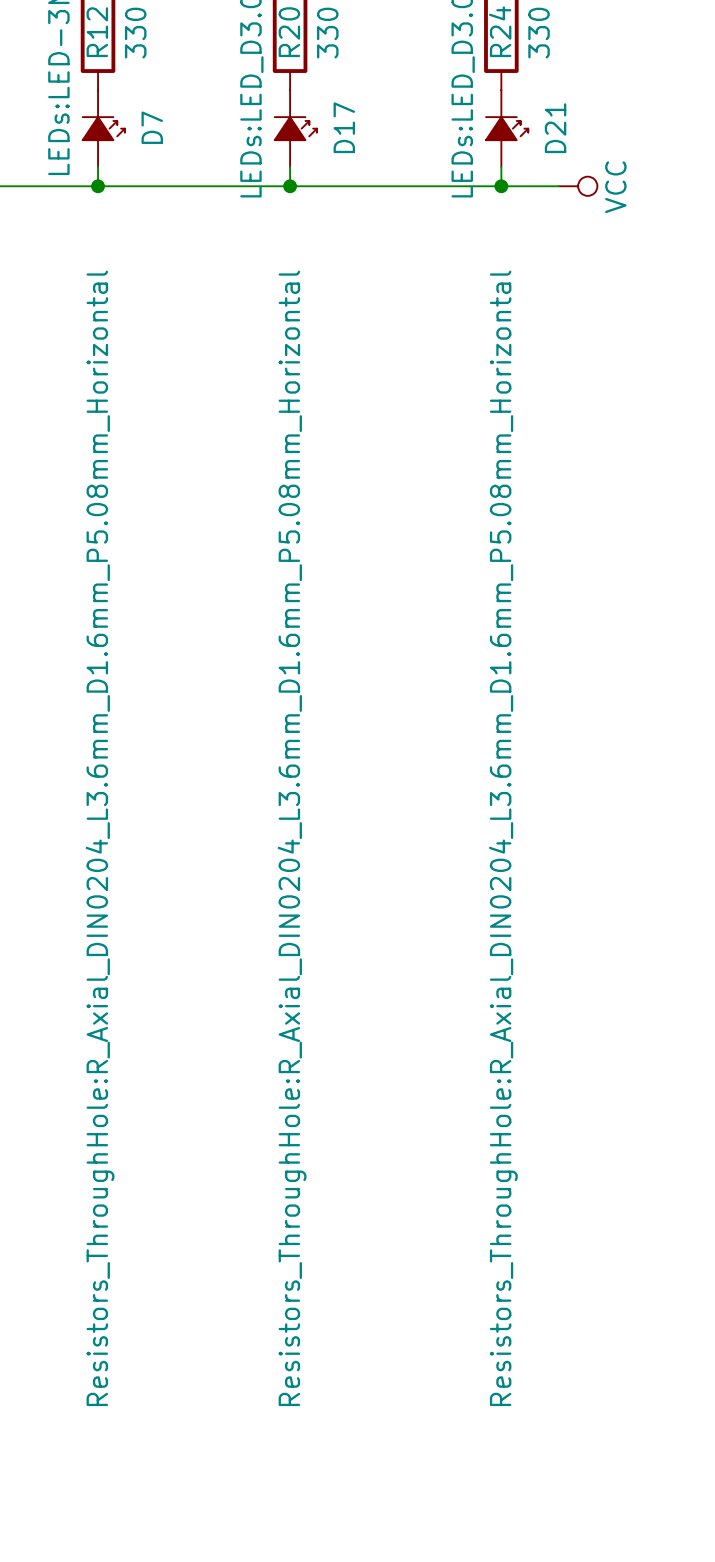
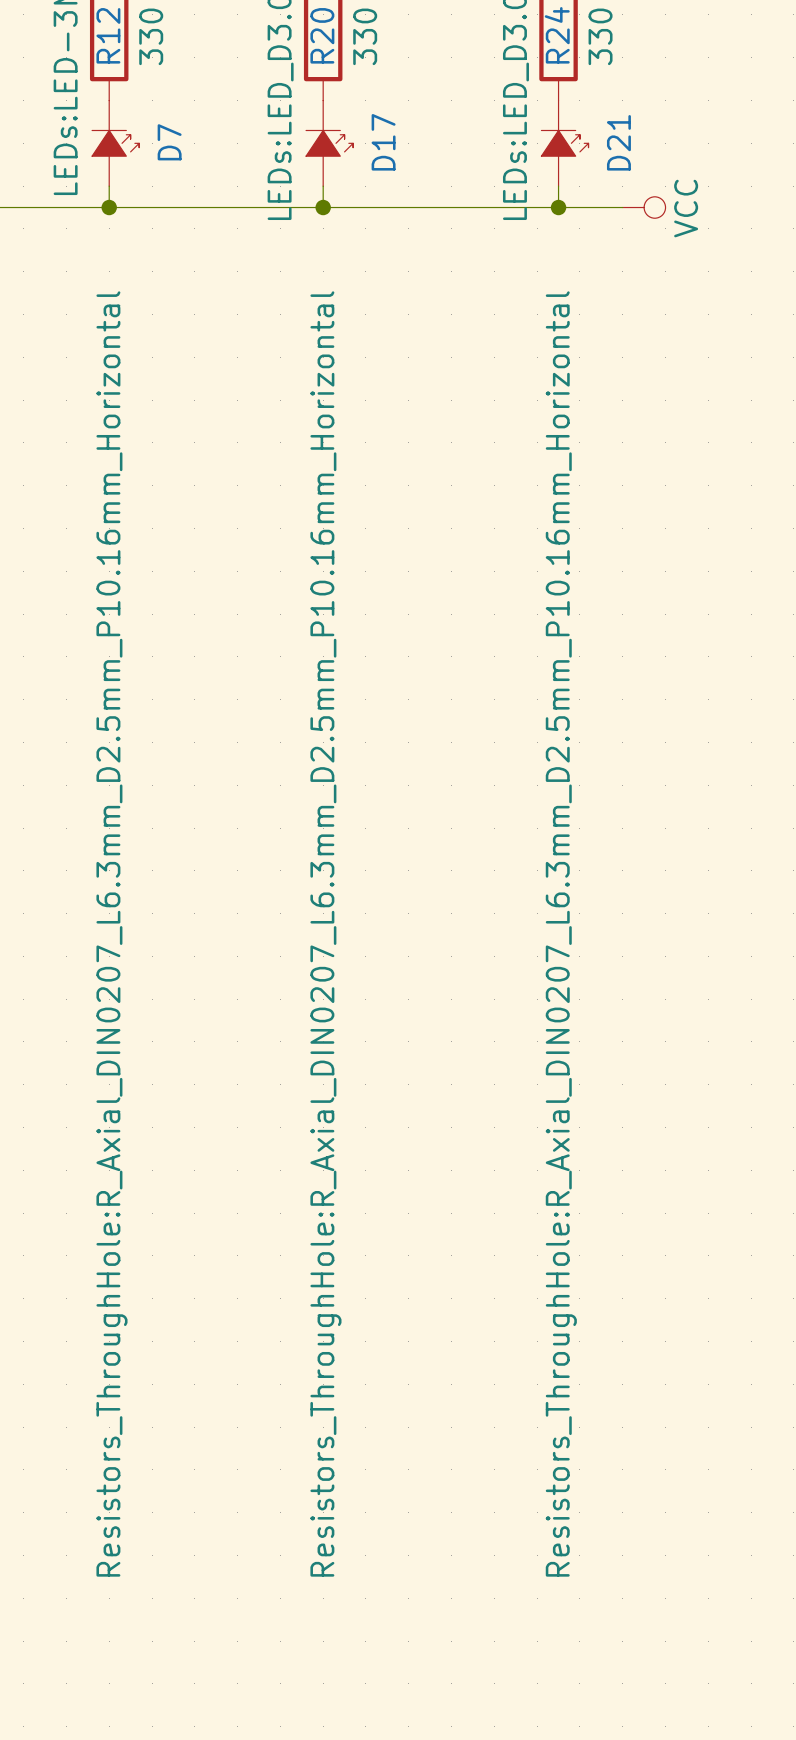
R12 text: Resistors_ThroughHole:R_Axial_DIN0204_L3.6mm_D1.6mm_P5.08mm_Horizontal (100, 838) -> Resistors_ThroughHole:R_Axial_DIN0207_L6.3mm_D2.5mm_P10.16mm_Horizontal (111, 933)
R20 text: Resistors_ThroughHole:R_Axial_DIN0204_L3.6mm_D1.6mm_P5.08mm_Horizontal (292, 838) -> Resistors_ThroughHole:R_Axial_DIN0207_L6.3mm_D2.5mm_P10.16mm_Horizontal (325, 933)
R24 text: Resistors_ThroughHole:R_Axial_DIN0204_L3.6mm_D1.6mm_P5.08mm_Horizontal (503, 838) -> Resistors_ThroughHole:R_Axial_DIN0207_L6.3mm_D2.5mm_P10.16mm_Horizontal (561, 933)

